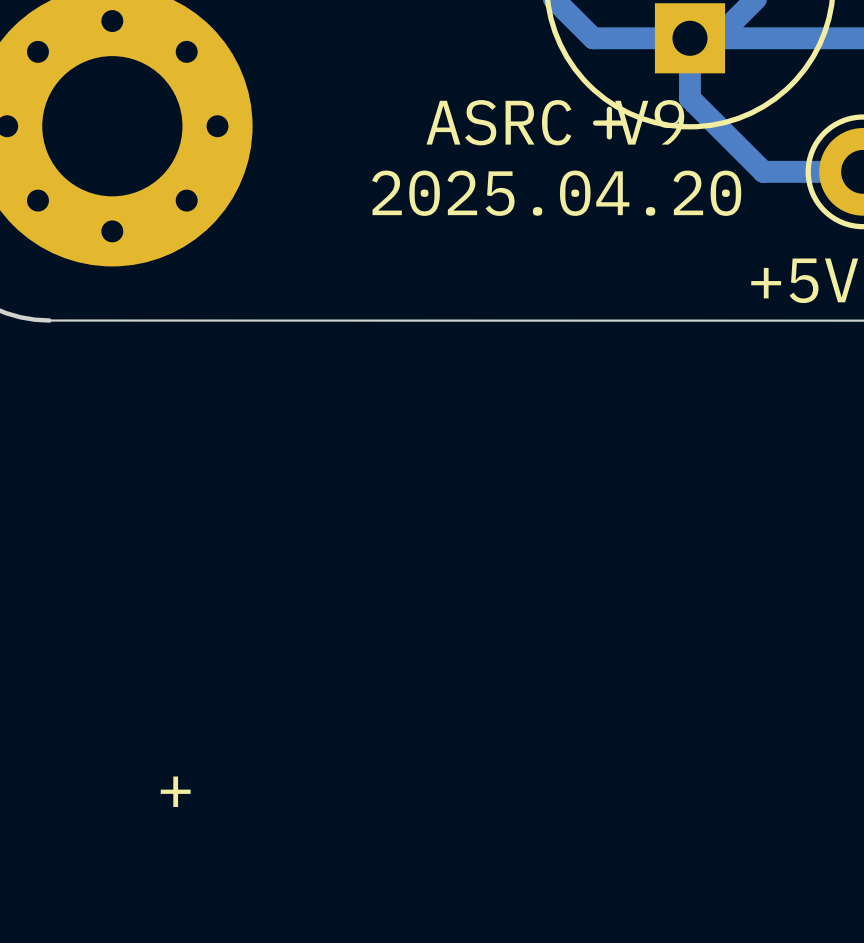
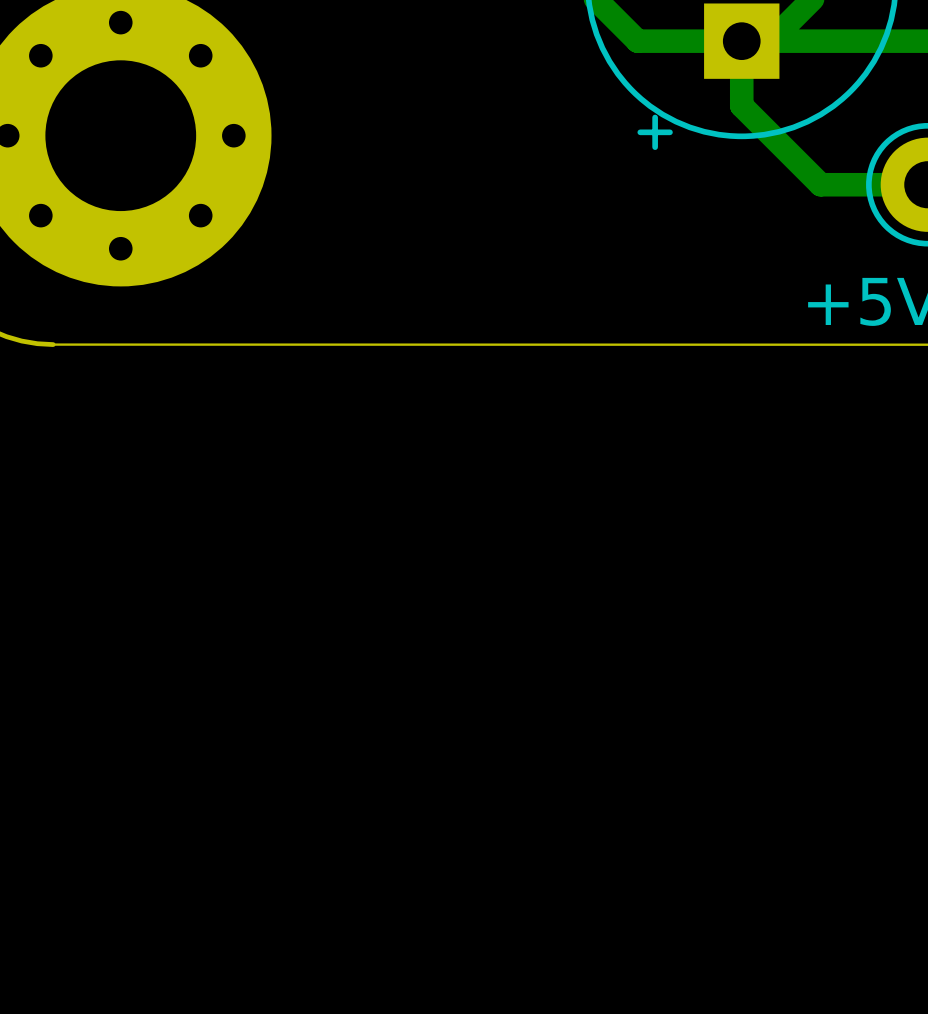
text: ASRC V9 (555, 122) -> none
text: 2025.04.20 (556, 193) -> none
text: + (175, 791) -> none

